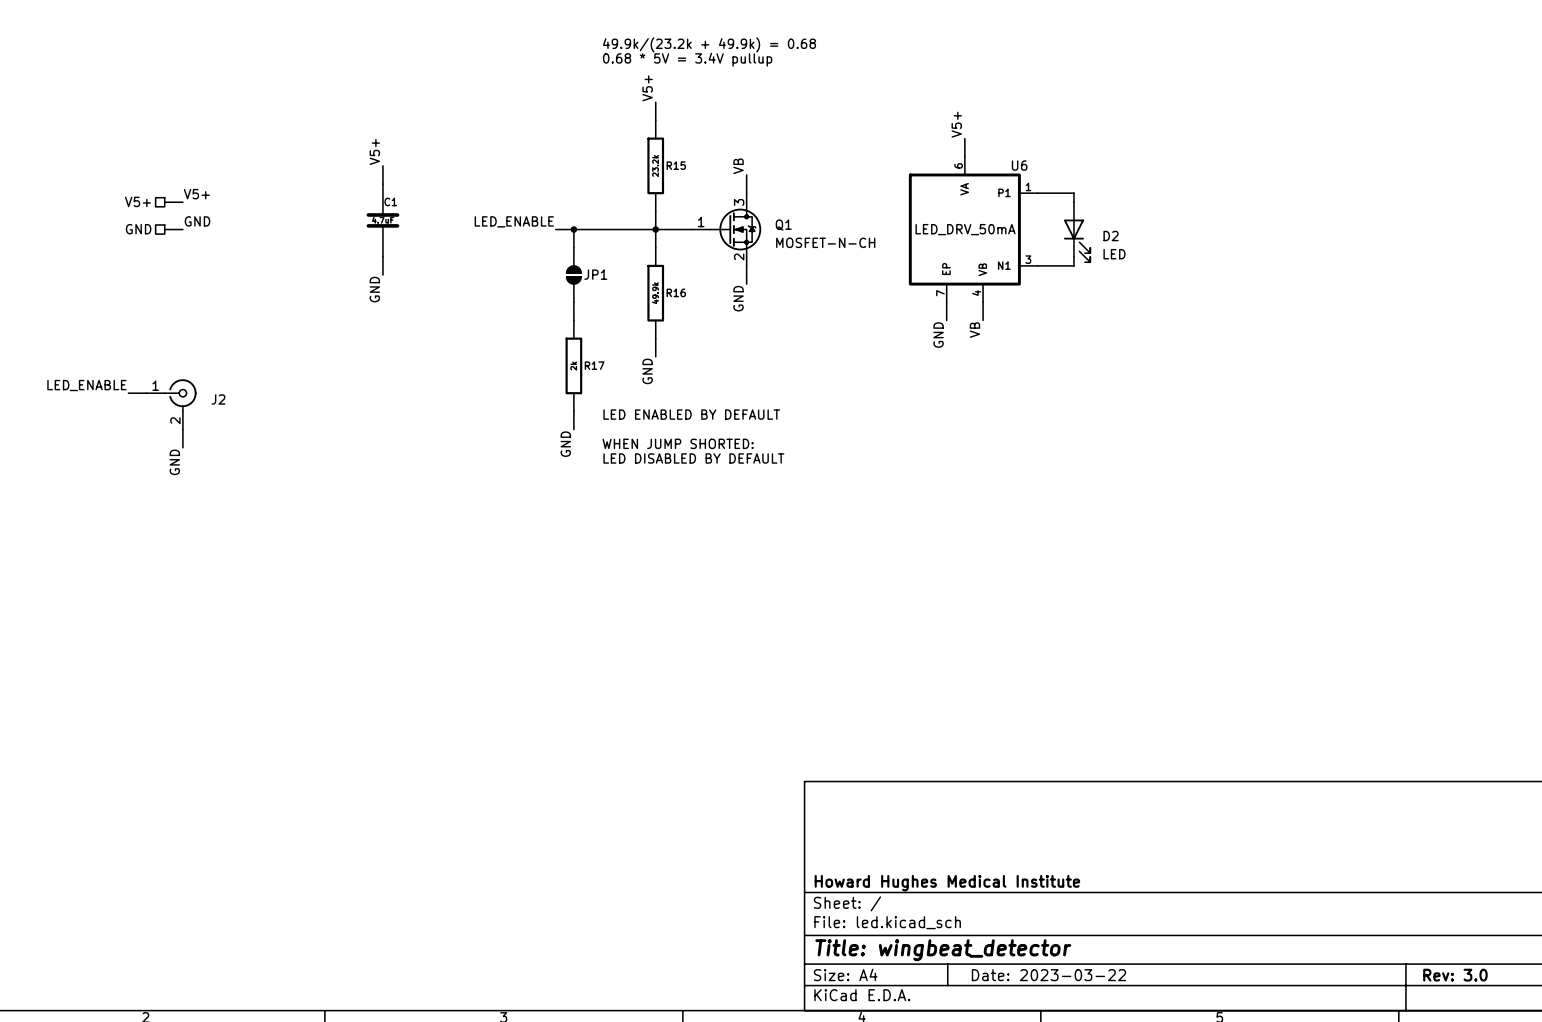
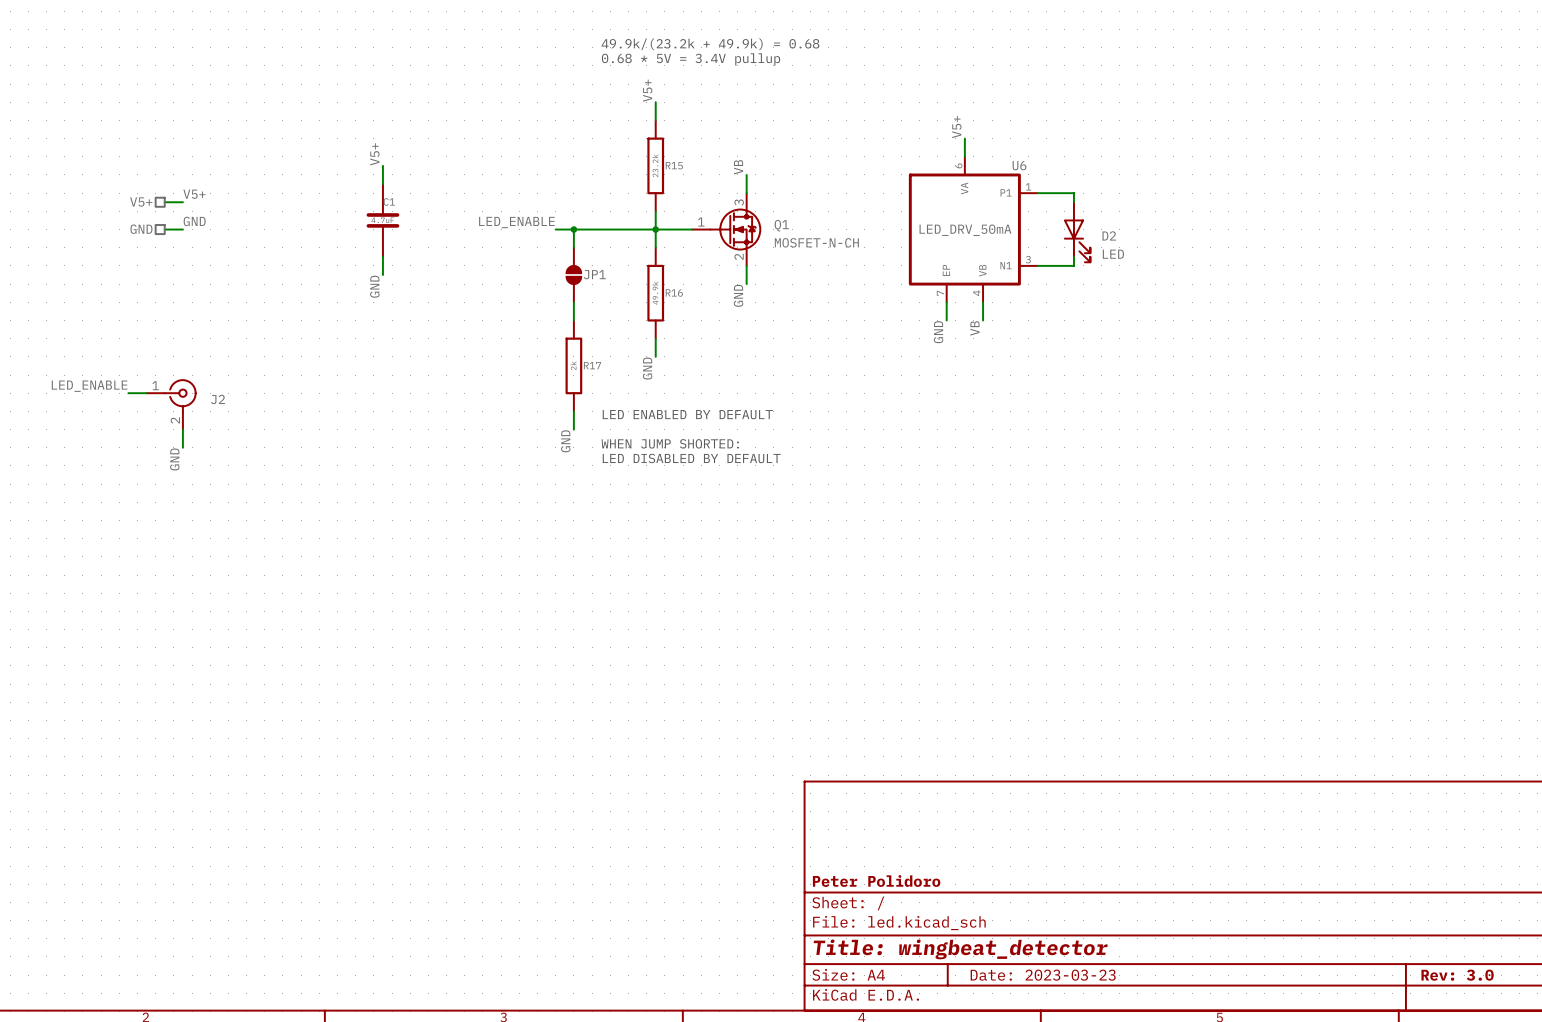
title block: Howard Hughes Medical Institute (947, 883) -> Peter Polidoro (876, 881)
title block: Date: 2023-03-22 (1048, 975) -> Date: 2023-03-23 (1043, 975)

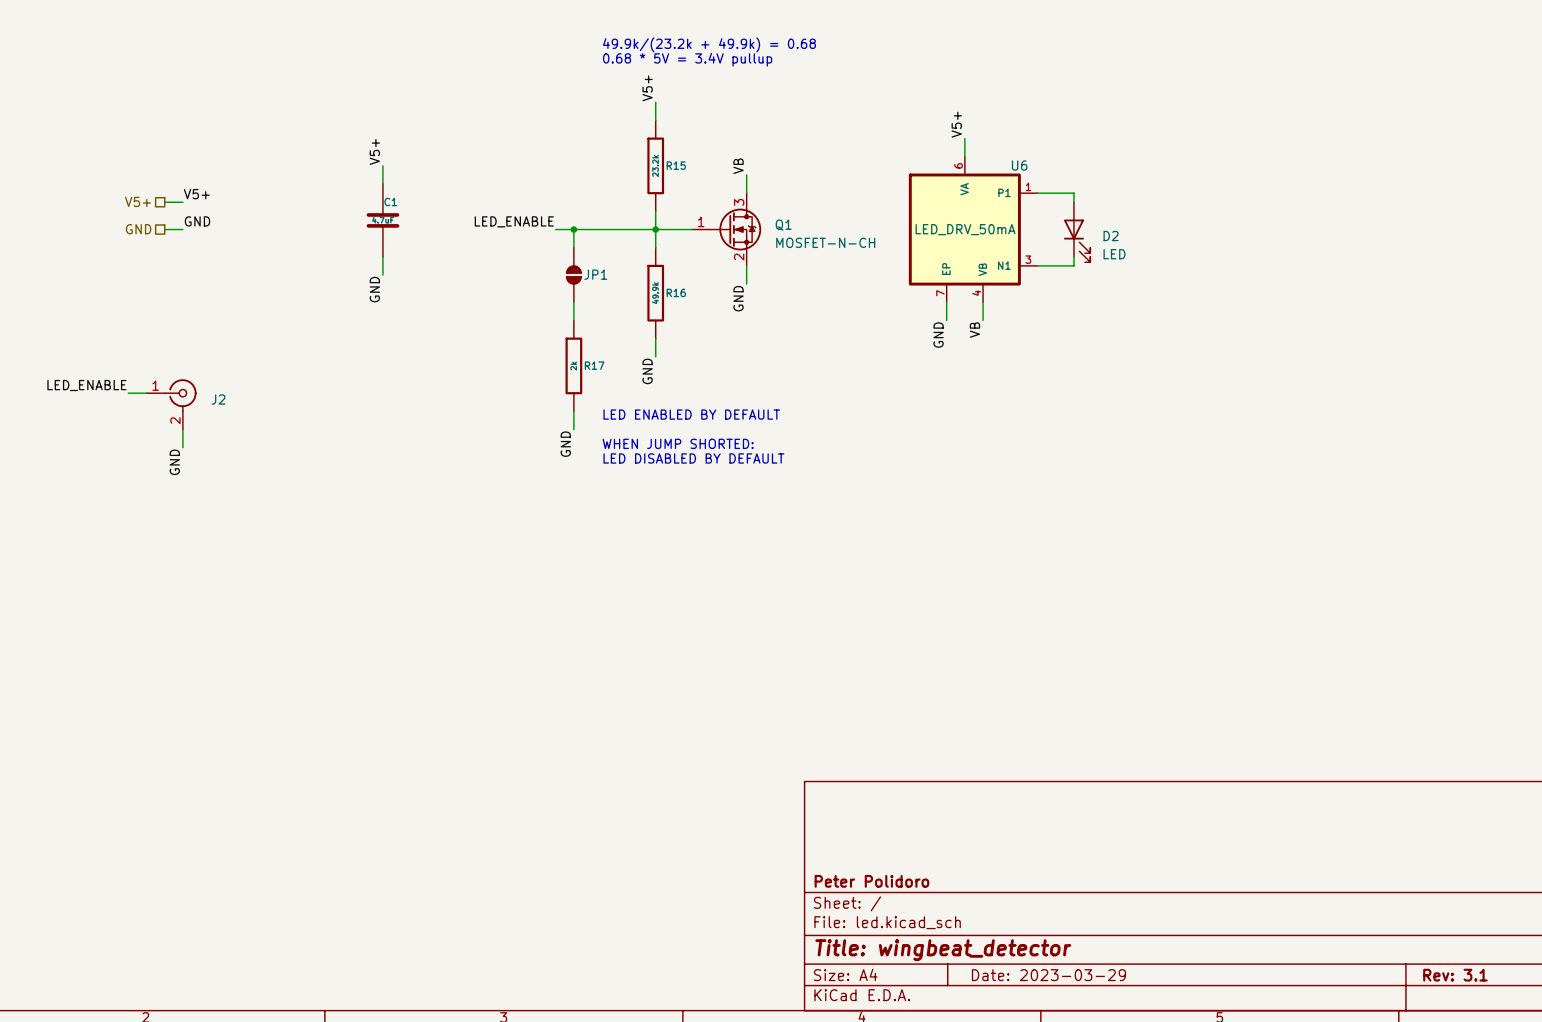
title block: Date: 2023-03-23 (1043, 975) -> Date: 2023-03-29 (1048, 975)
title block: Rev: 3.0 (1457, 975) -> Rev: 3.1 (1455, 975)

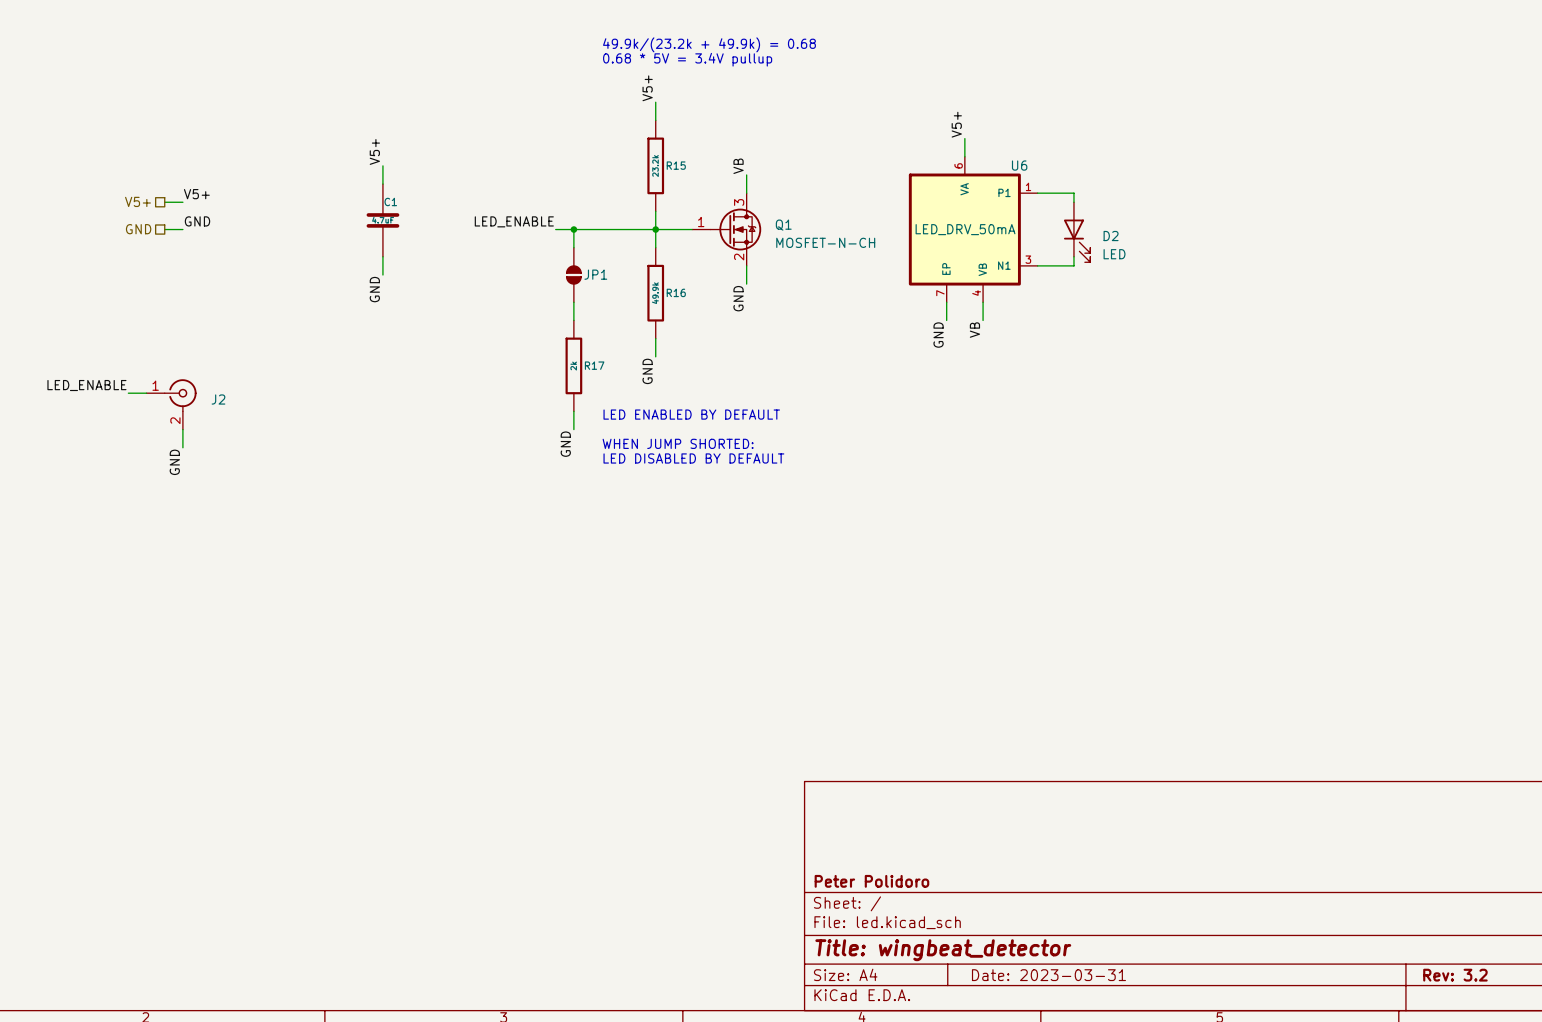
title block: Date: 2023-03-29 (1048, 975) -> Date: 2023-03-31 (1048, 975)
title block: Rev: 3.1 (1455, 975) -> Rev: 3.2 (1455, 975)

